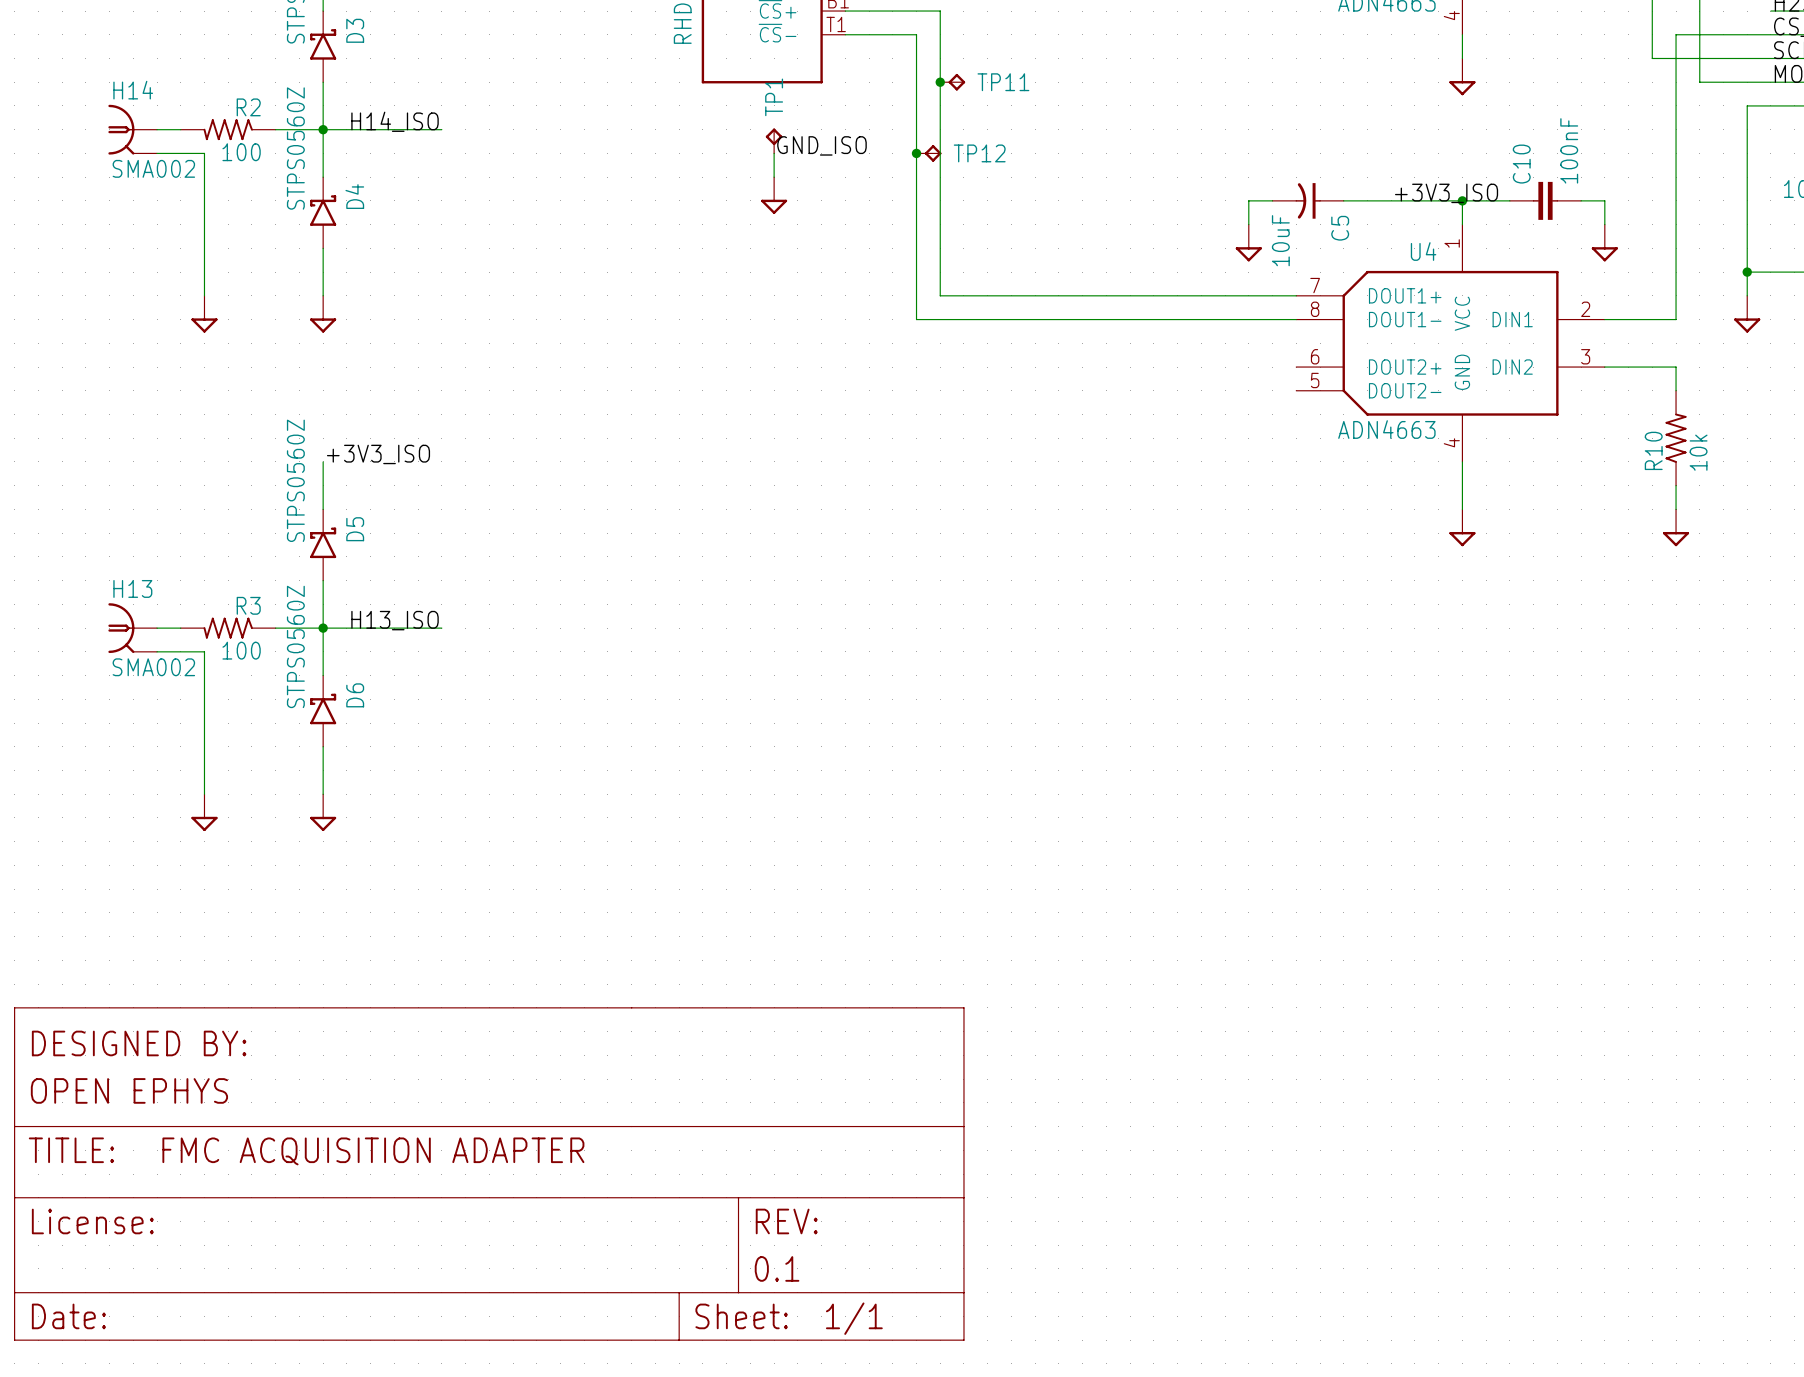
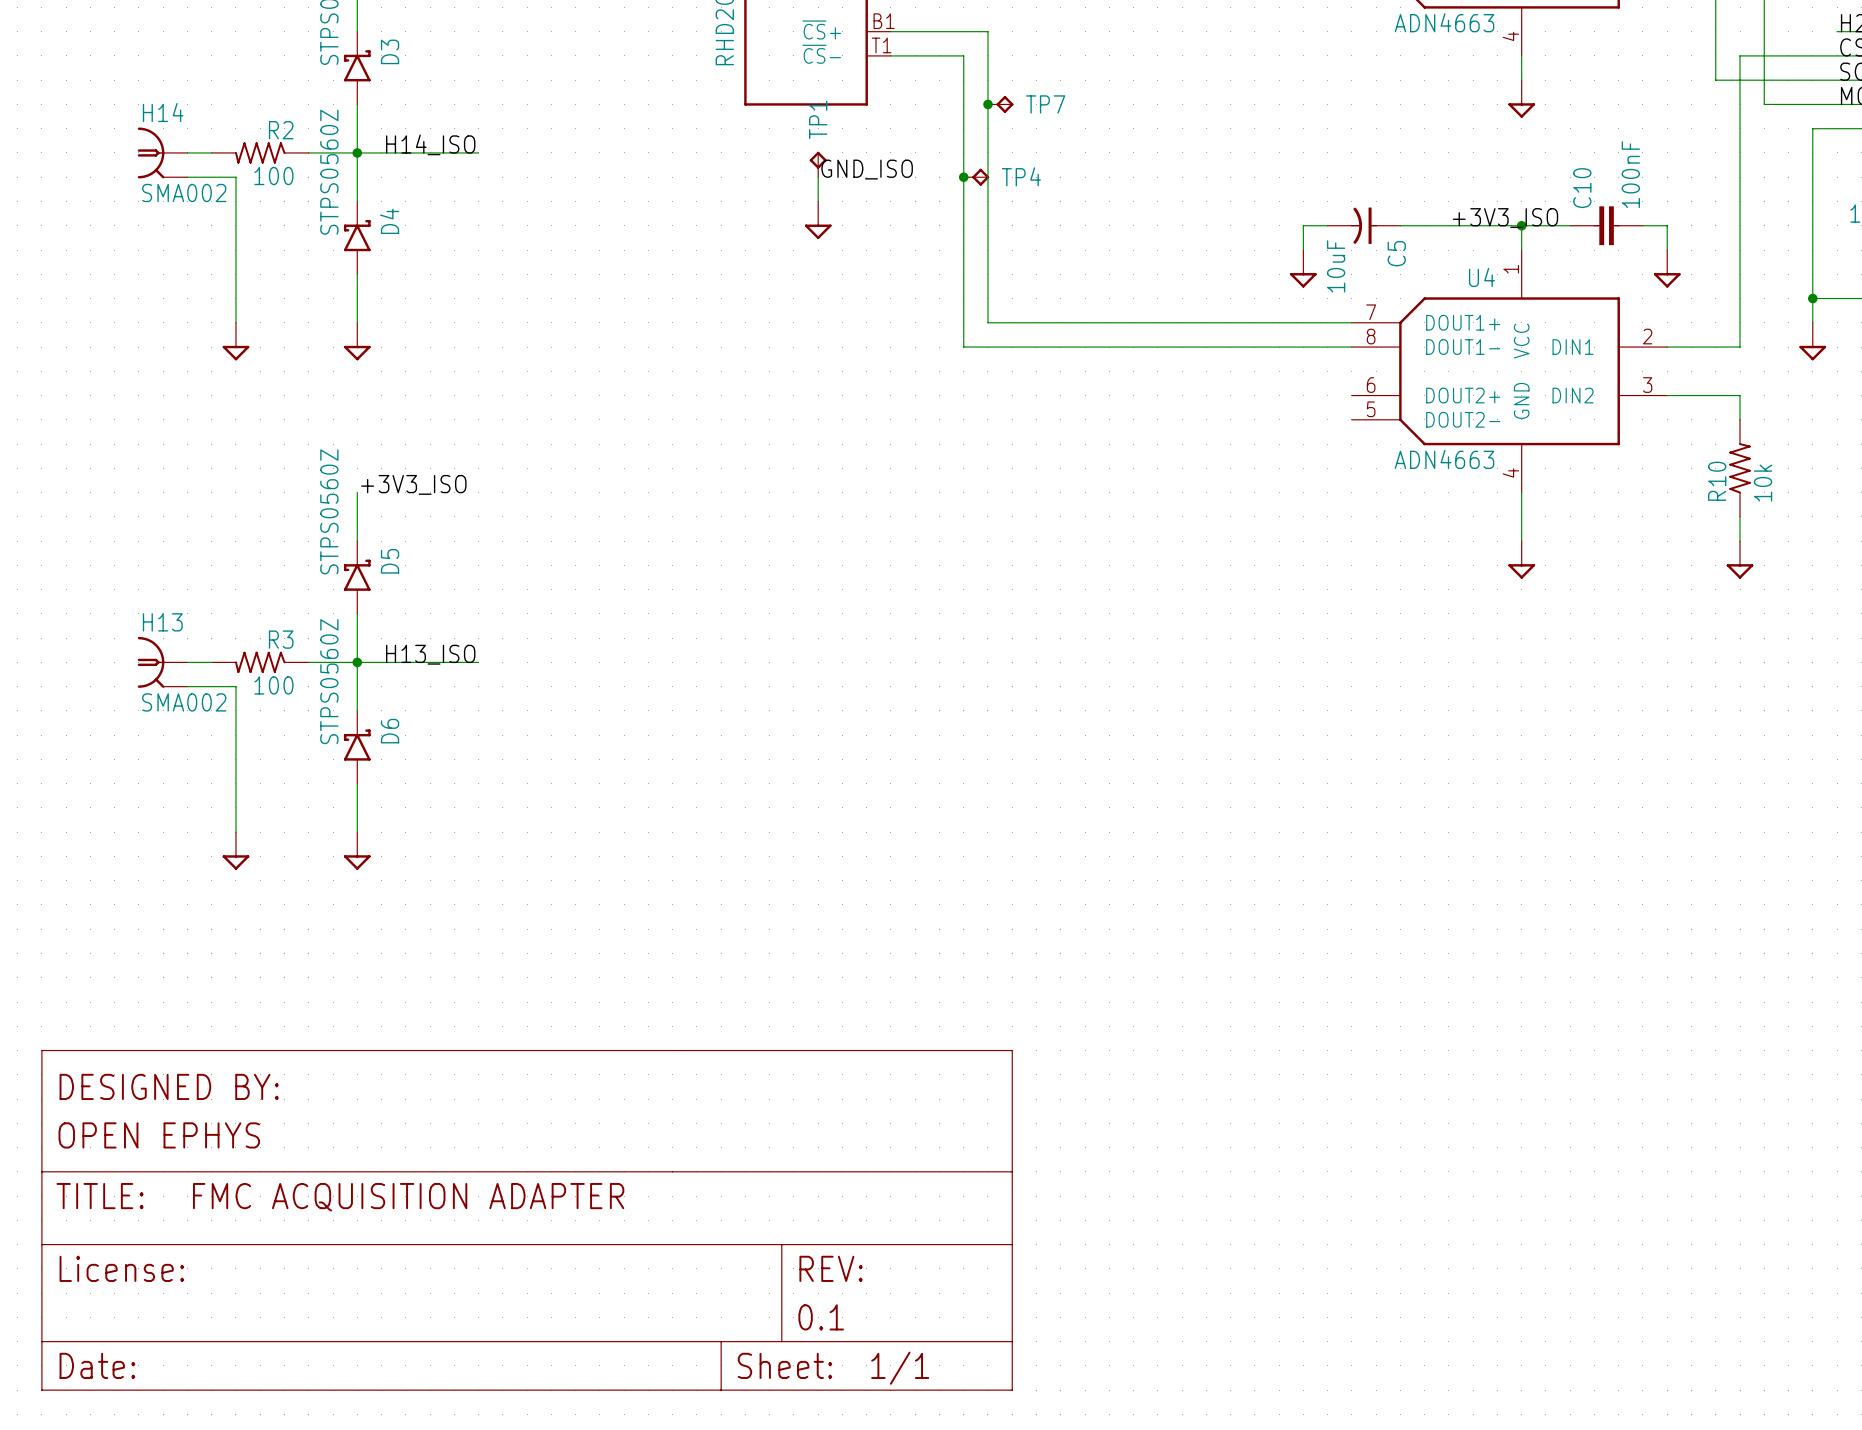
TP11 name: TP11 (1003, 82) -> TP7 (1045, 104)
TP12 name: TP12 (979, 153) -> TP4 (1021, 176)

